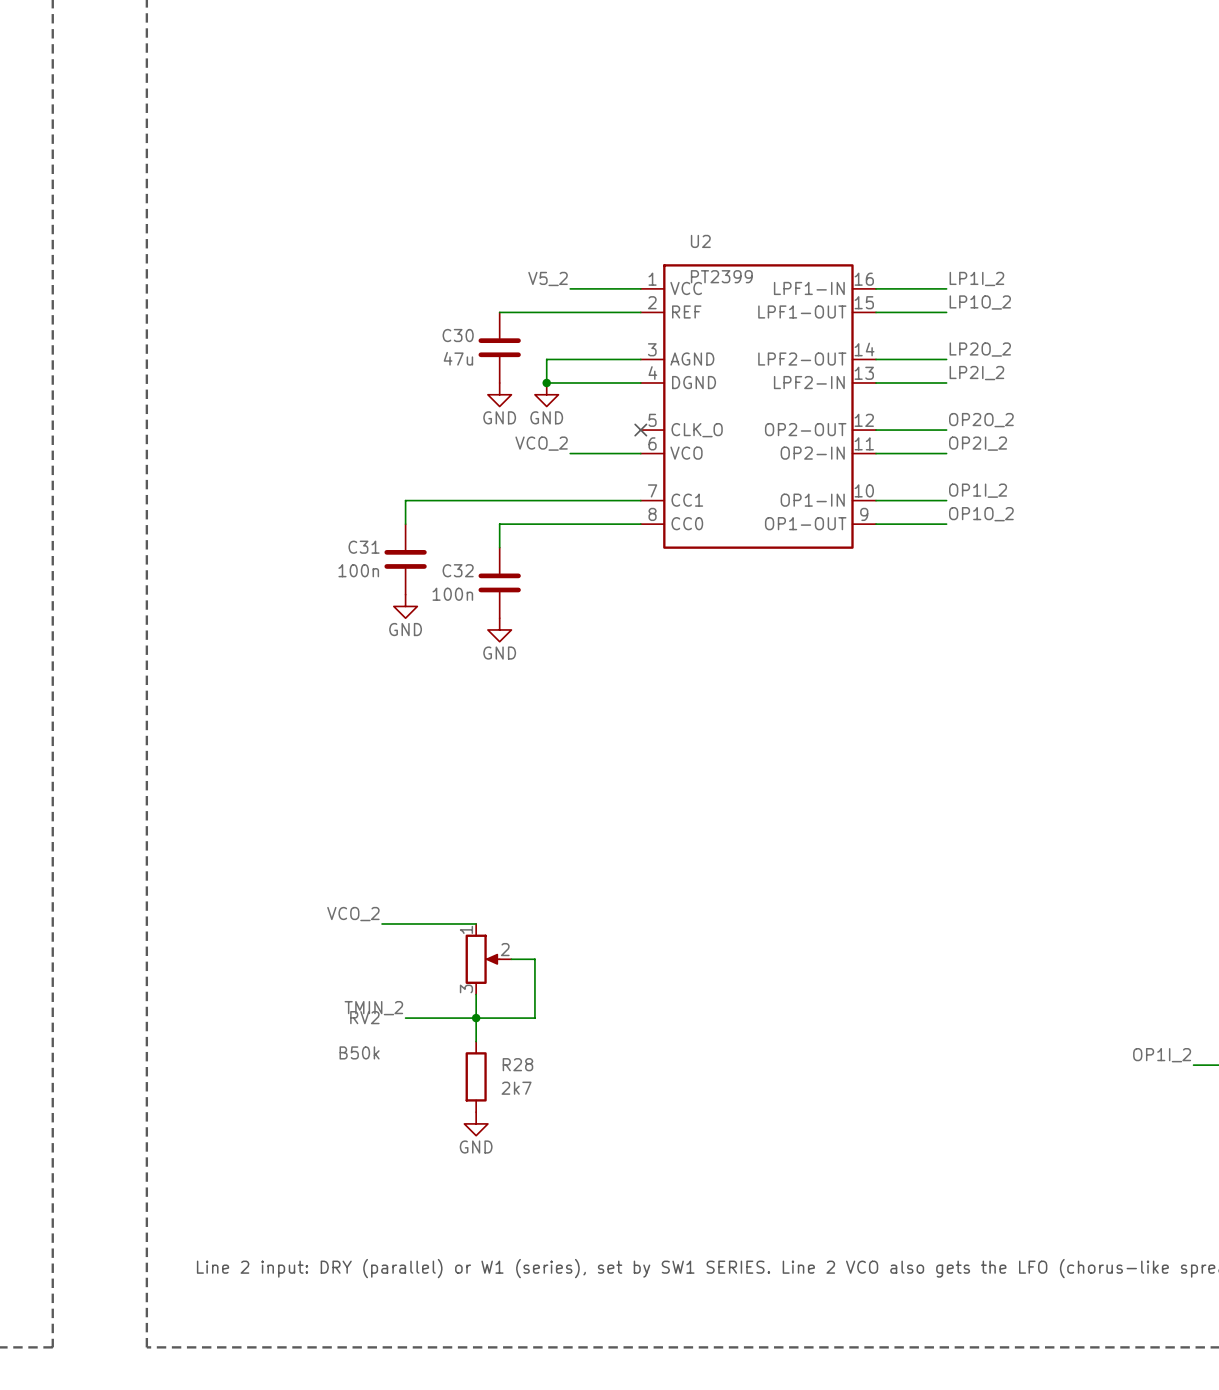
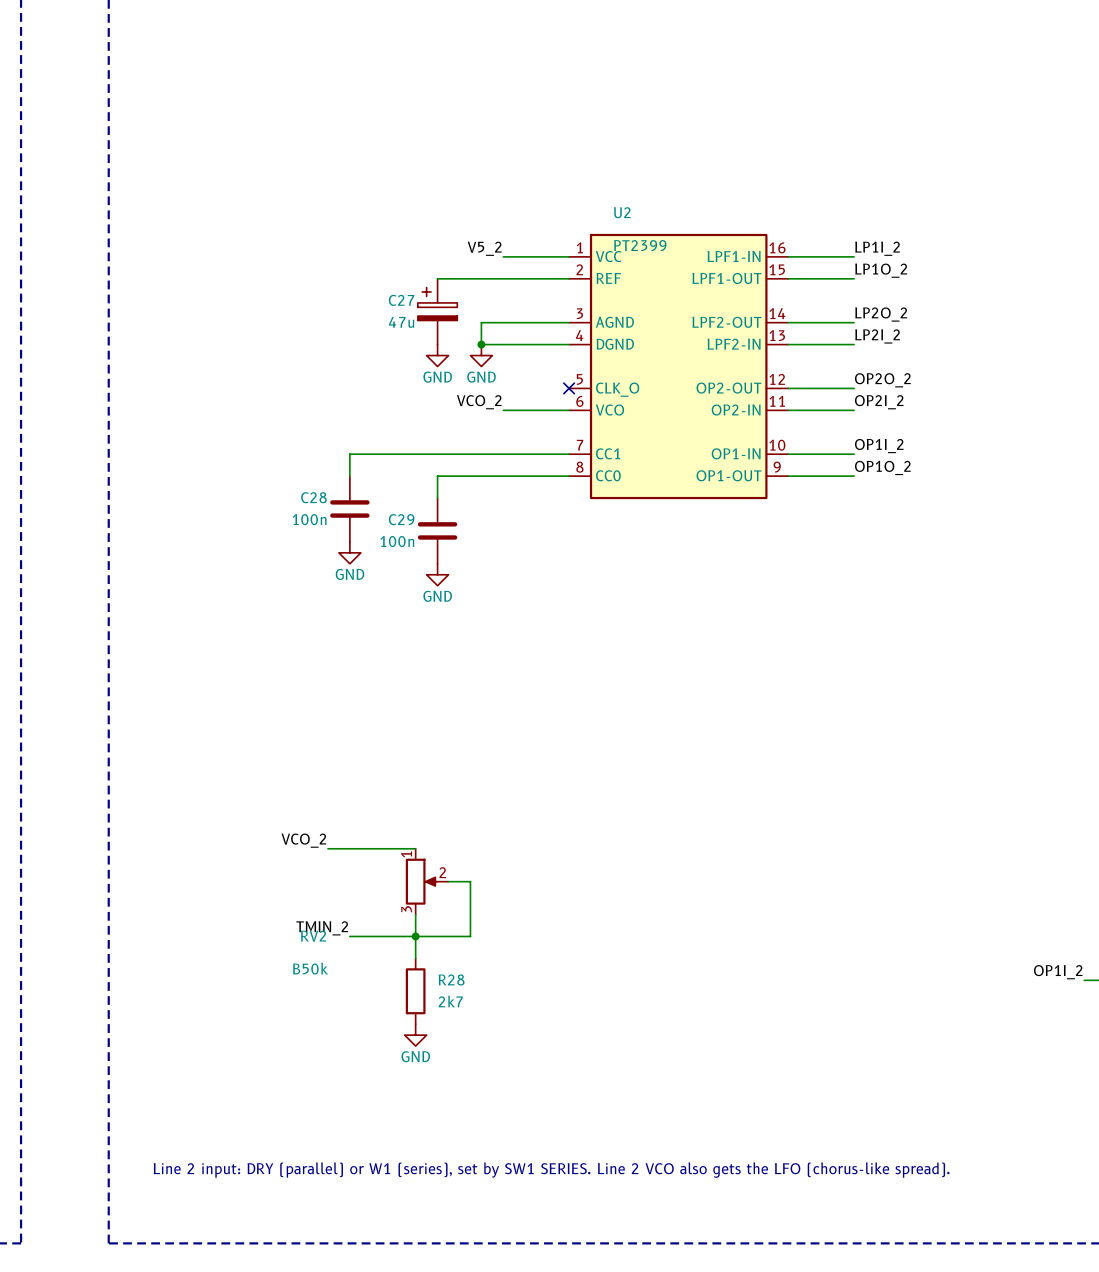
C30: 47u (499, 347) -> none
C27: none -> 47u (437, 311)
C31 name: C31 (364, 547) -> C28 (313, 497)
C32 name: C32 (458, 570) -> C29 (401, 519)

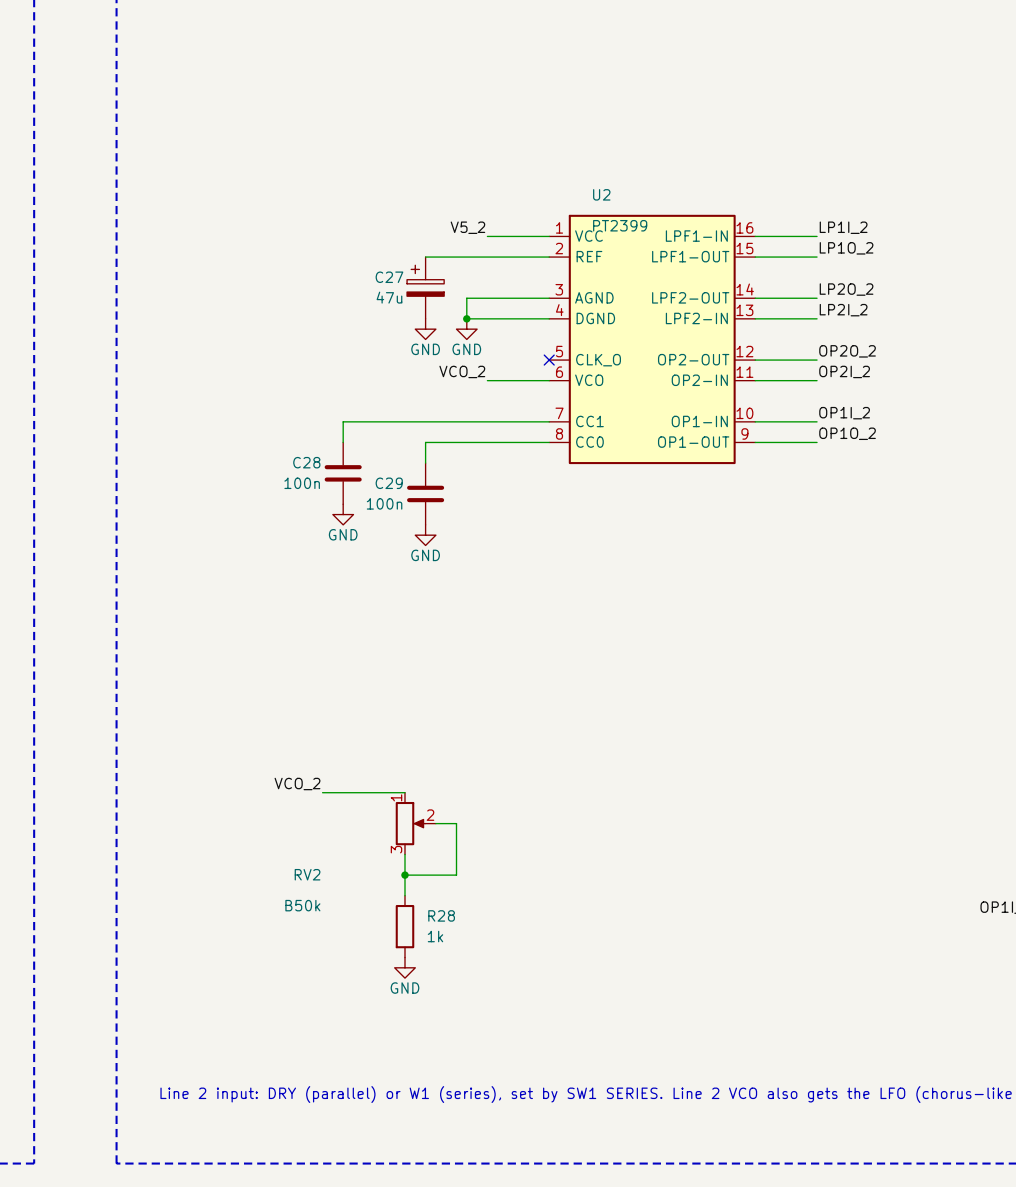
label: TMIN_2 (322, 928) -> none
wire: (349, 936) (415, 936) -> none
R28 value: 2k7 (450, 1001) -> 1k (435, 936)

